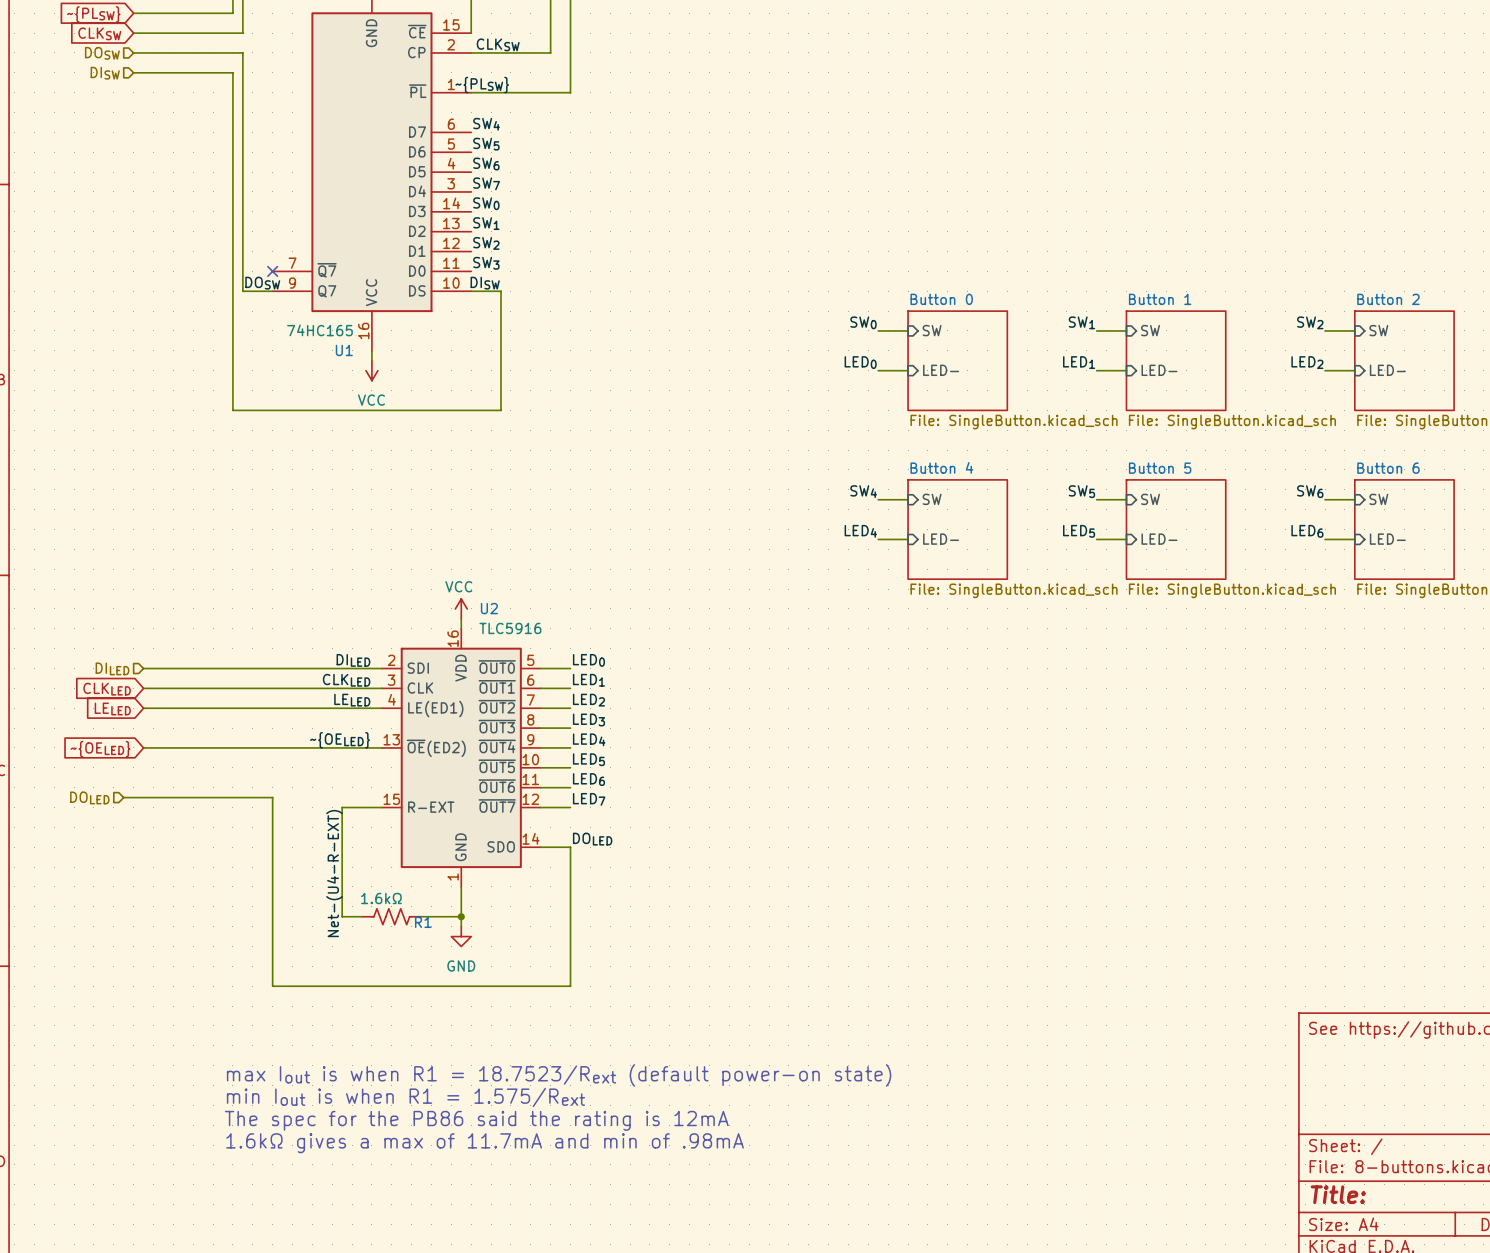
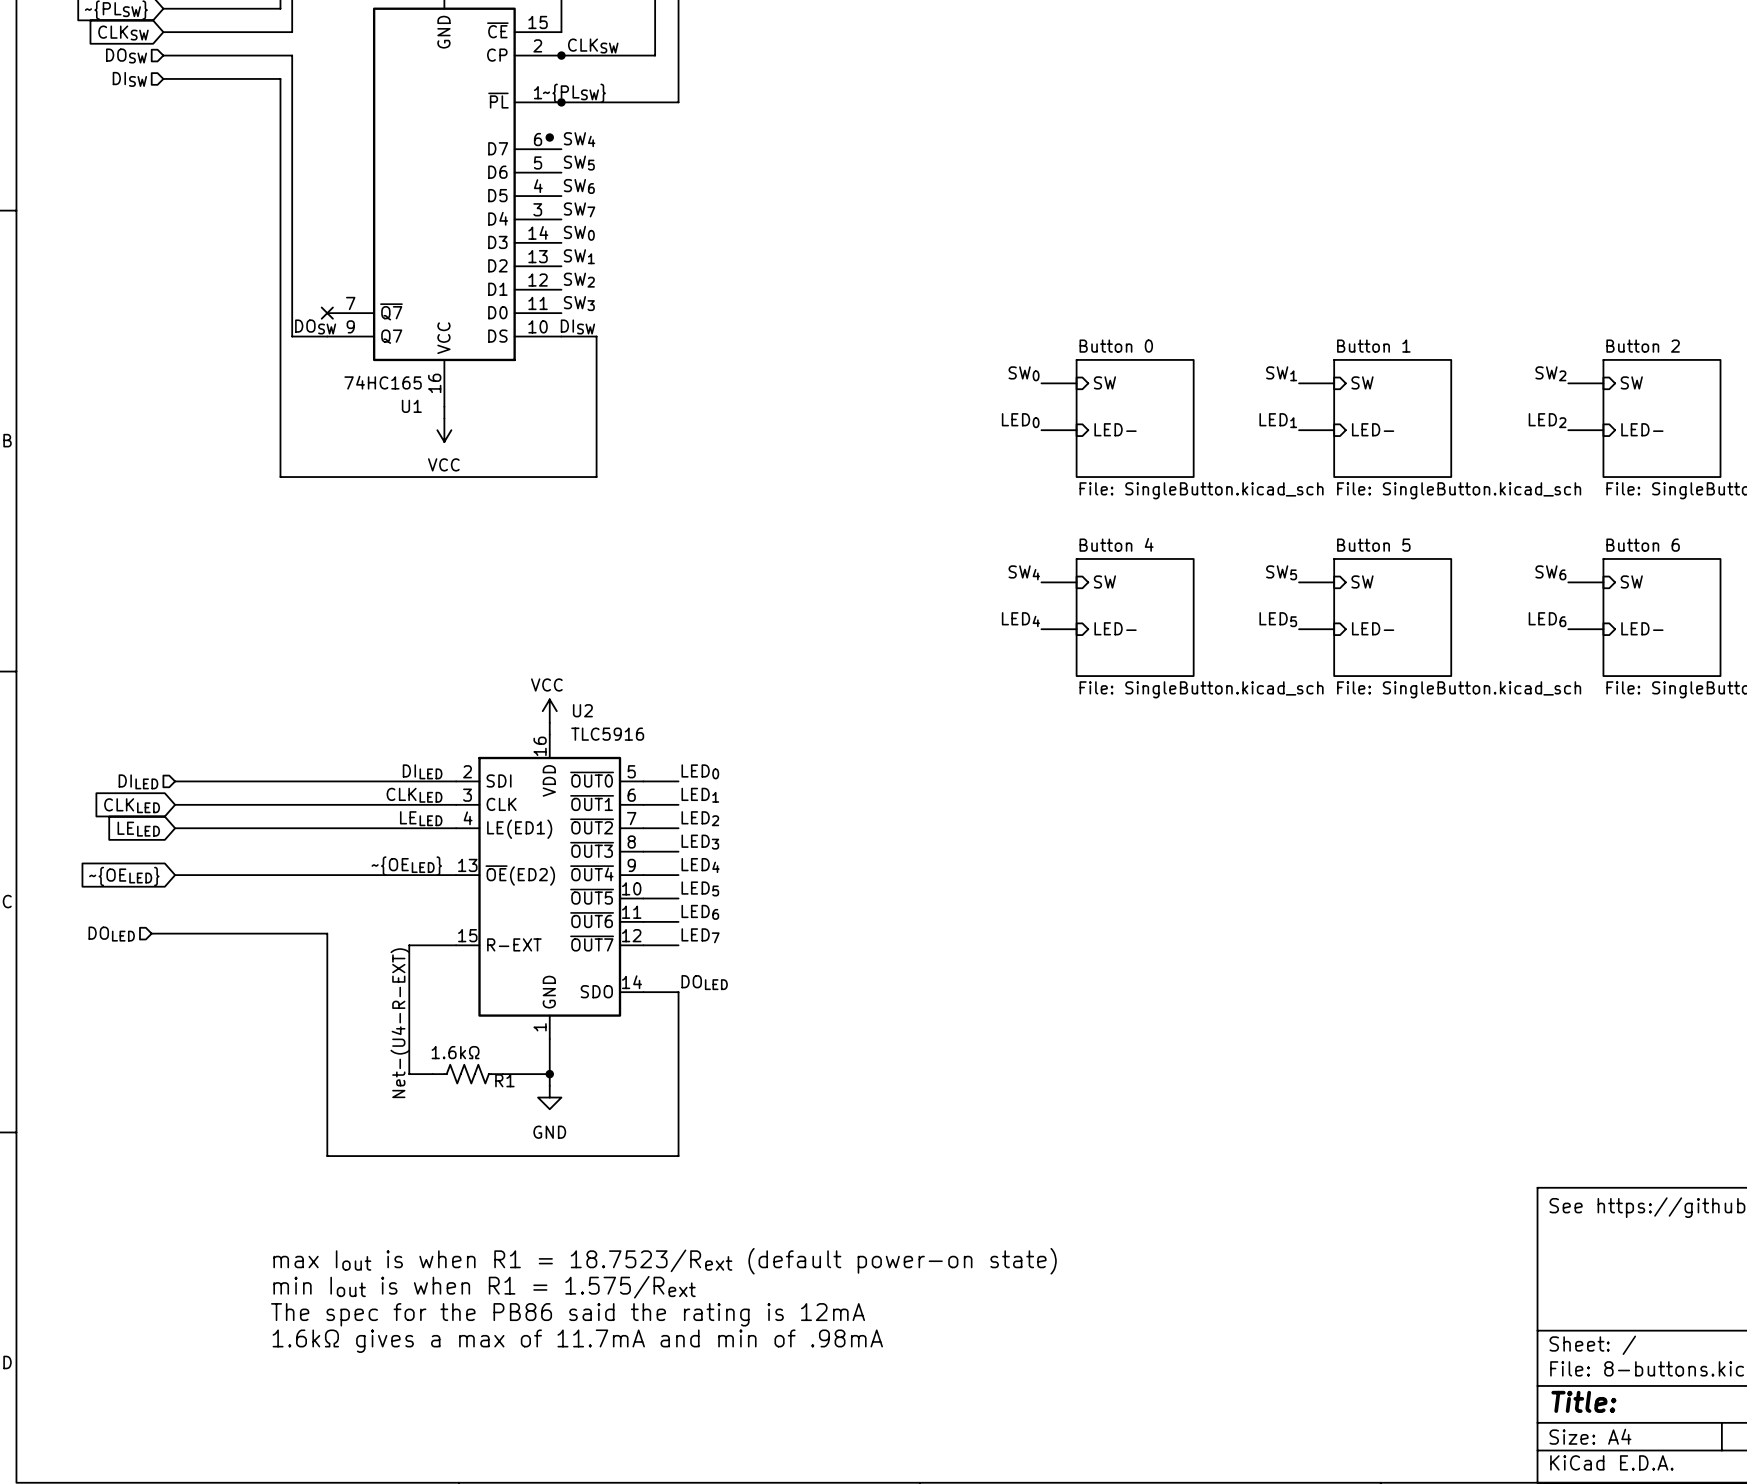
junction: none -> (561, 55)
junction: none -> (561, 102)
junction: none -> (549, 137)

